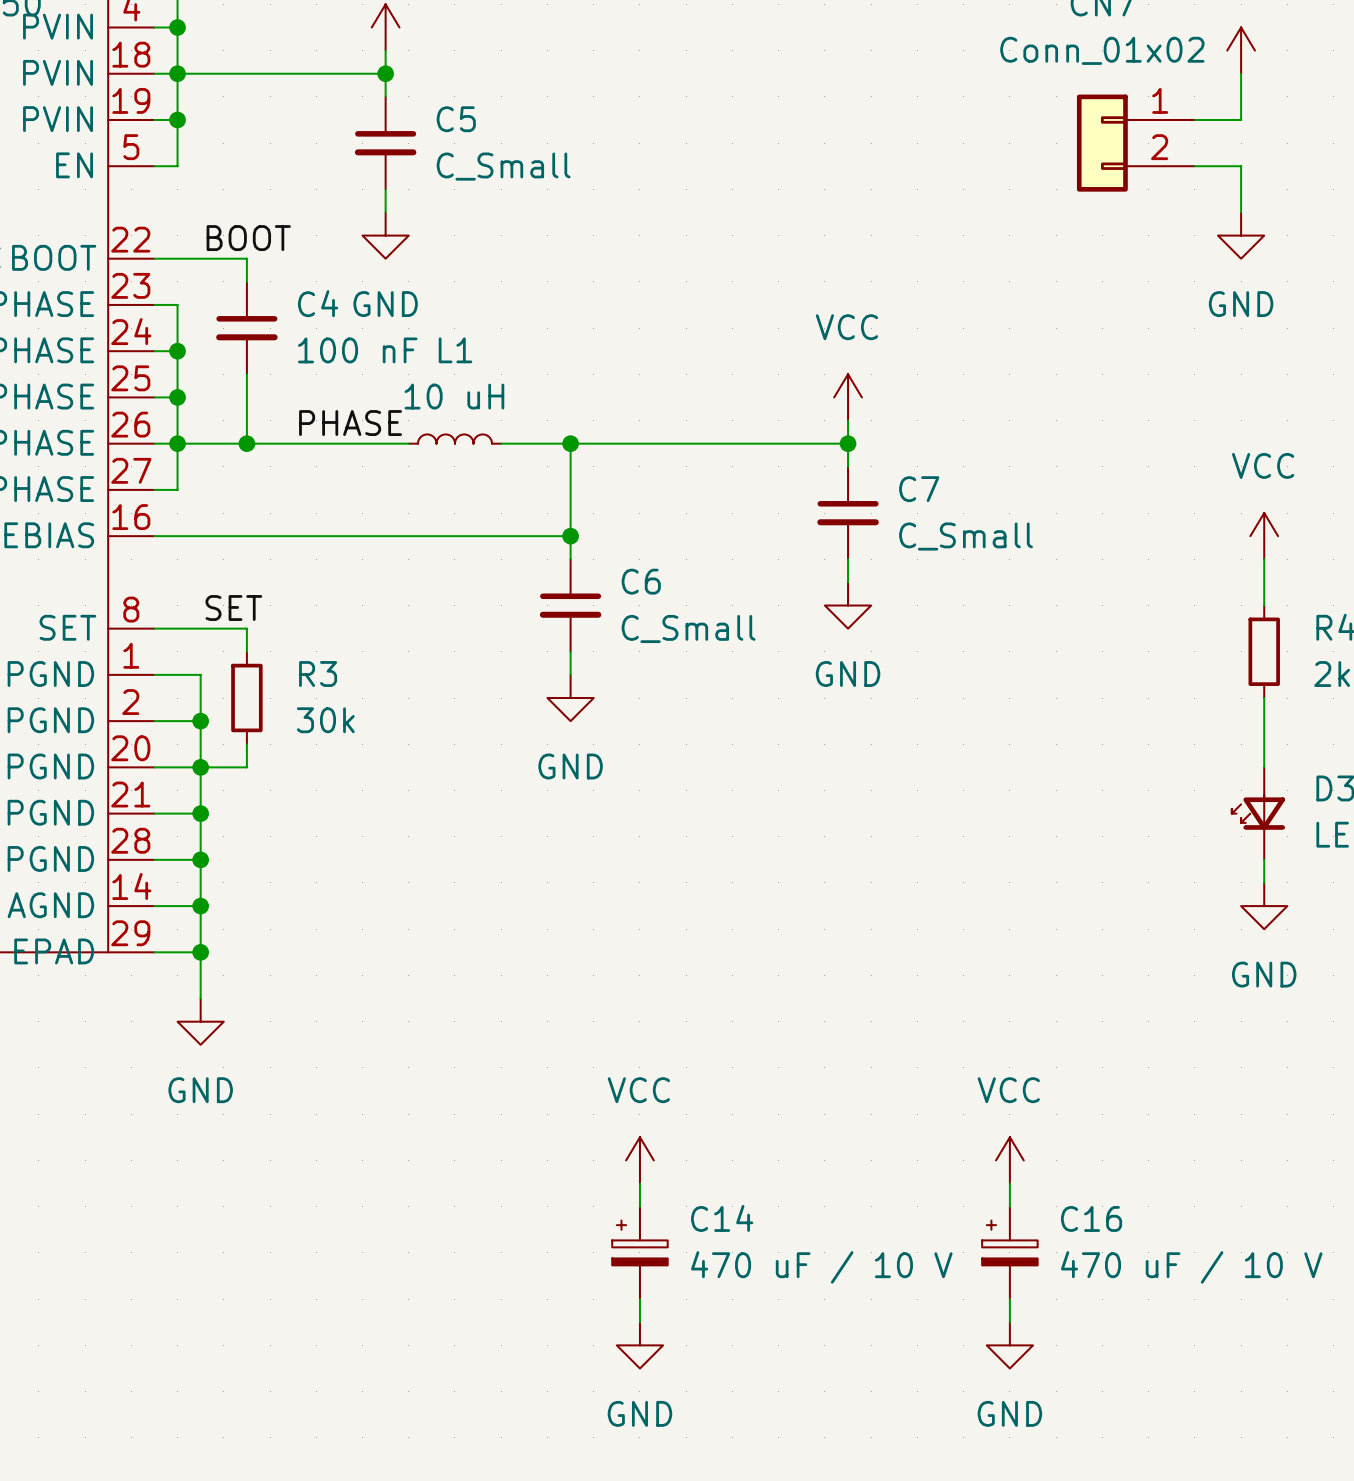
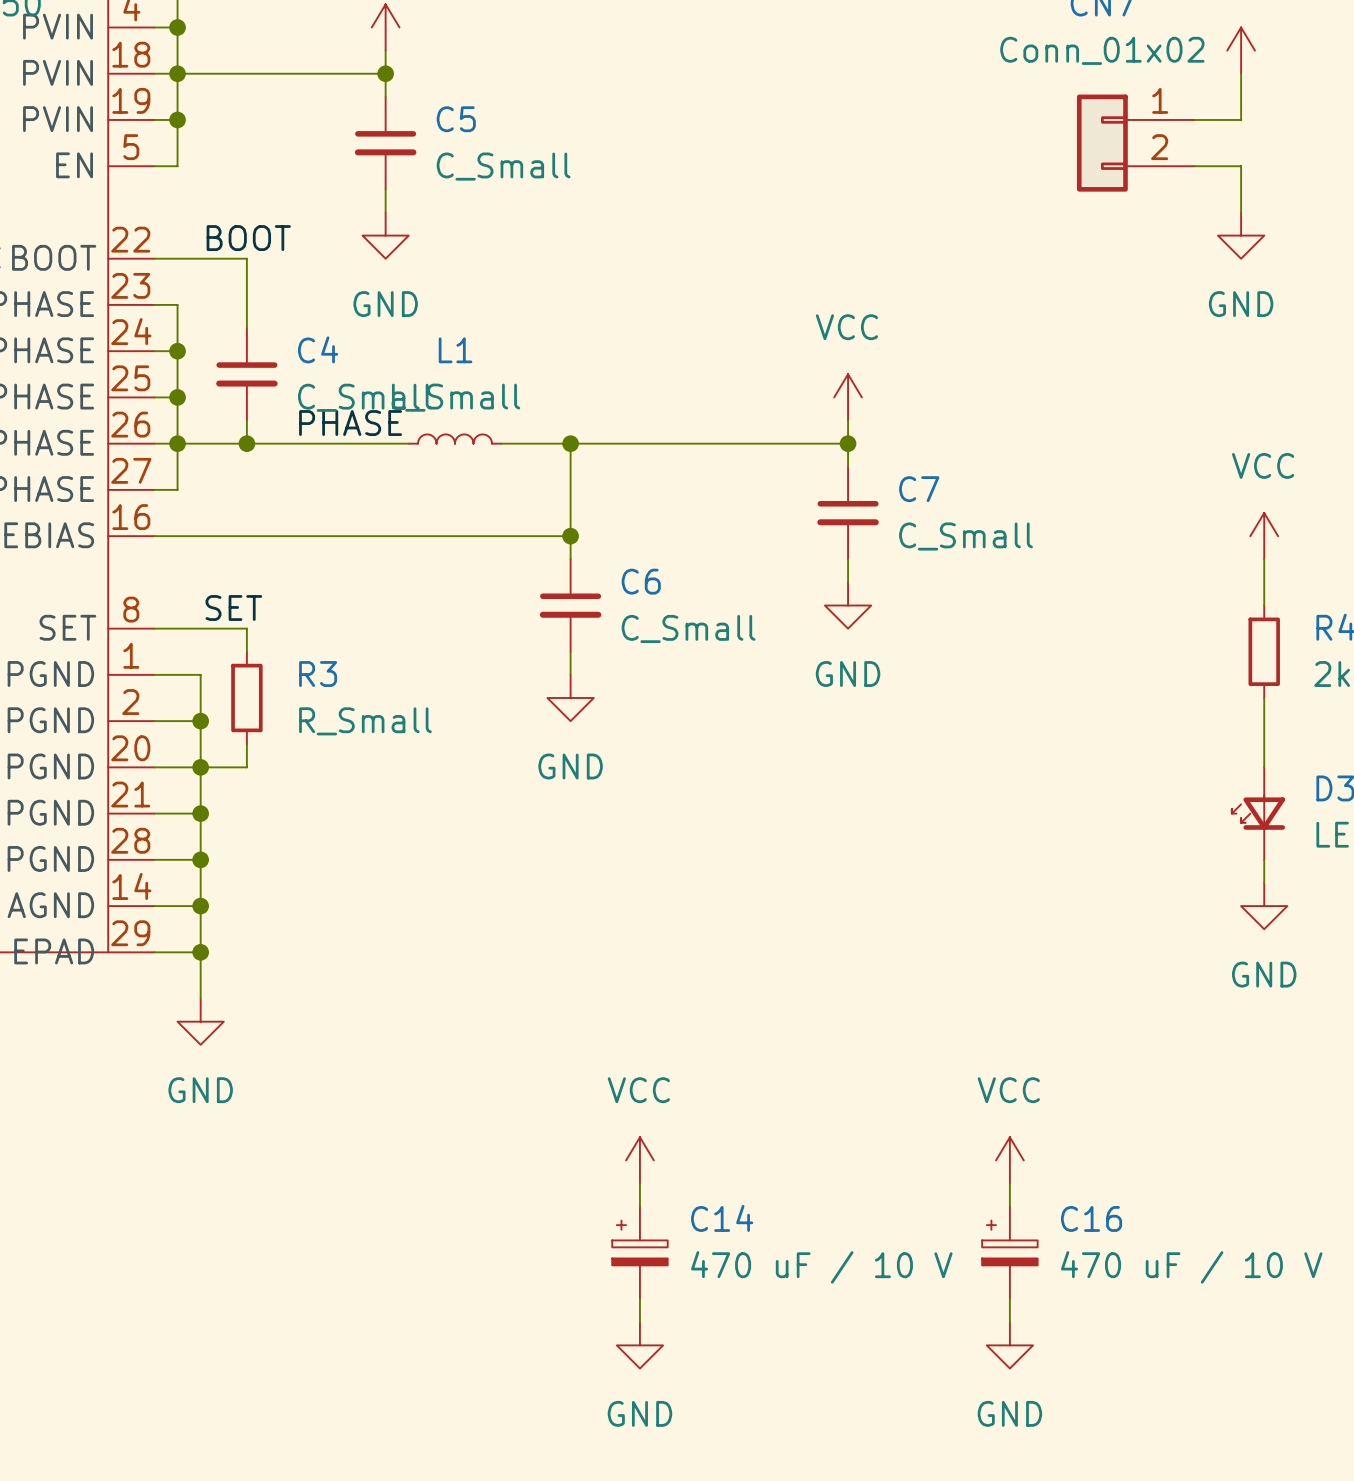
C4 position: (246, 328) -> (246, 374)
C4 value: 100 nF (357, 350) -> C_Small (364, 397)
L1 value: 10 uH (454, 396) -> L_Small (456, 397)
R3 value: 30k (325, 720) -> R_Small (365, 721)

